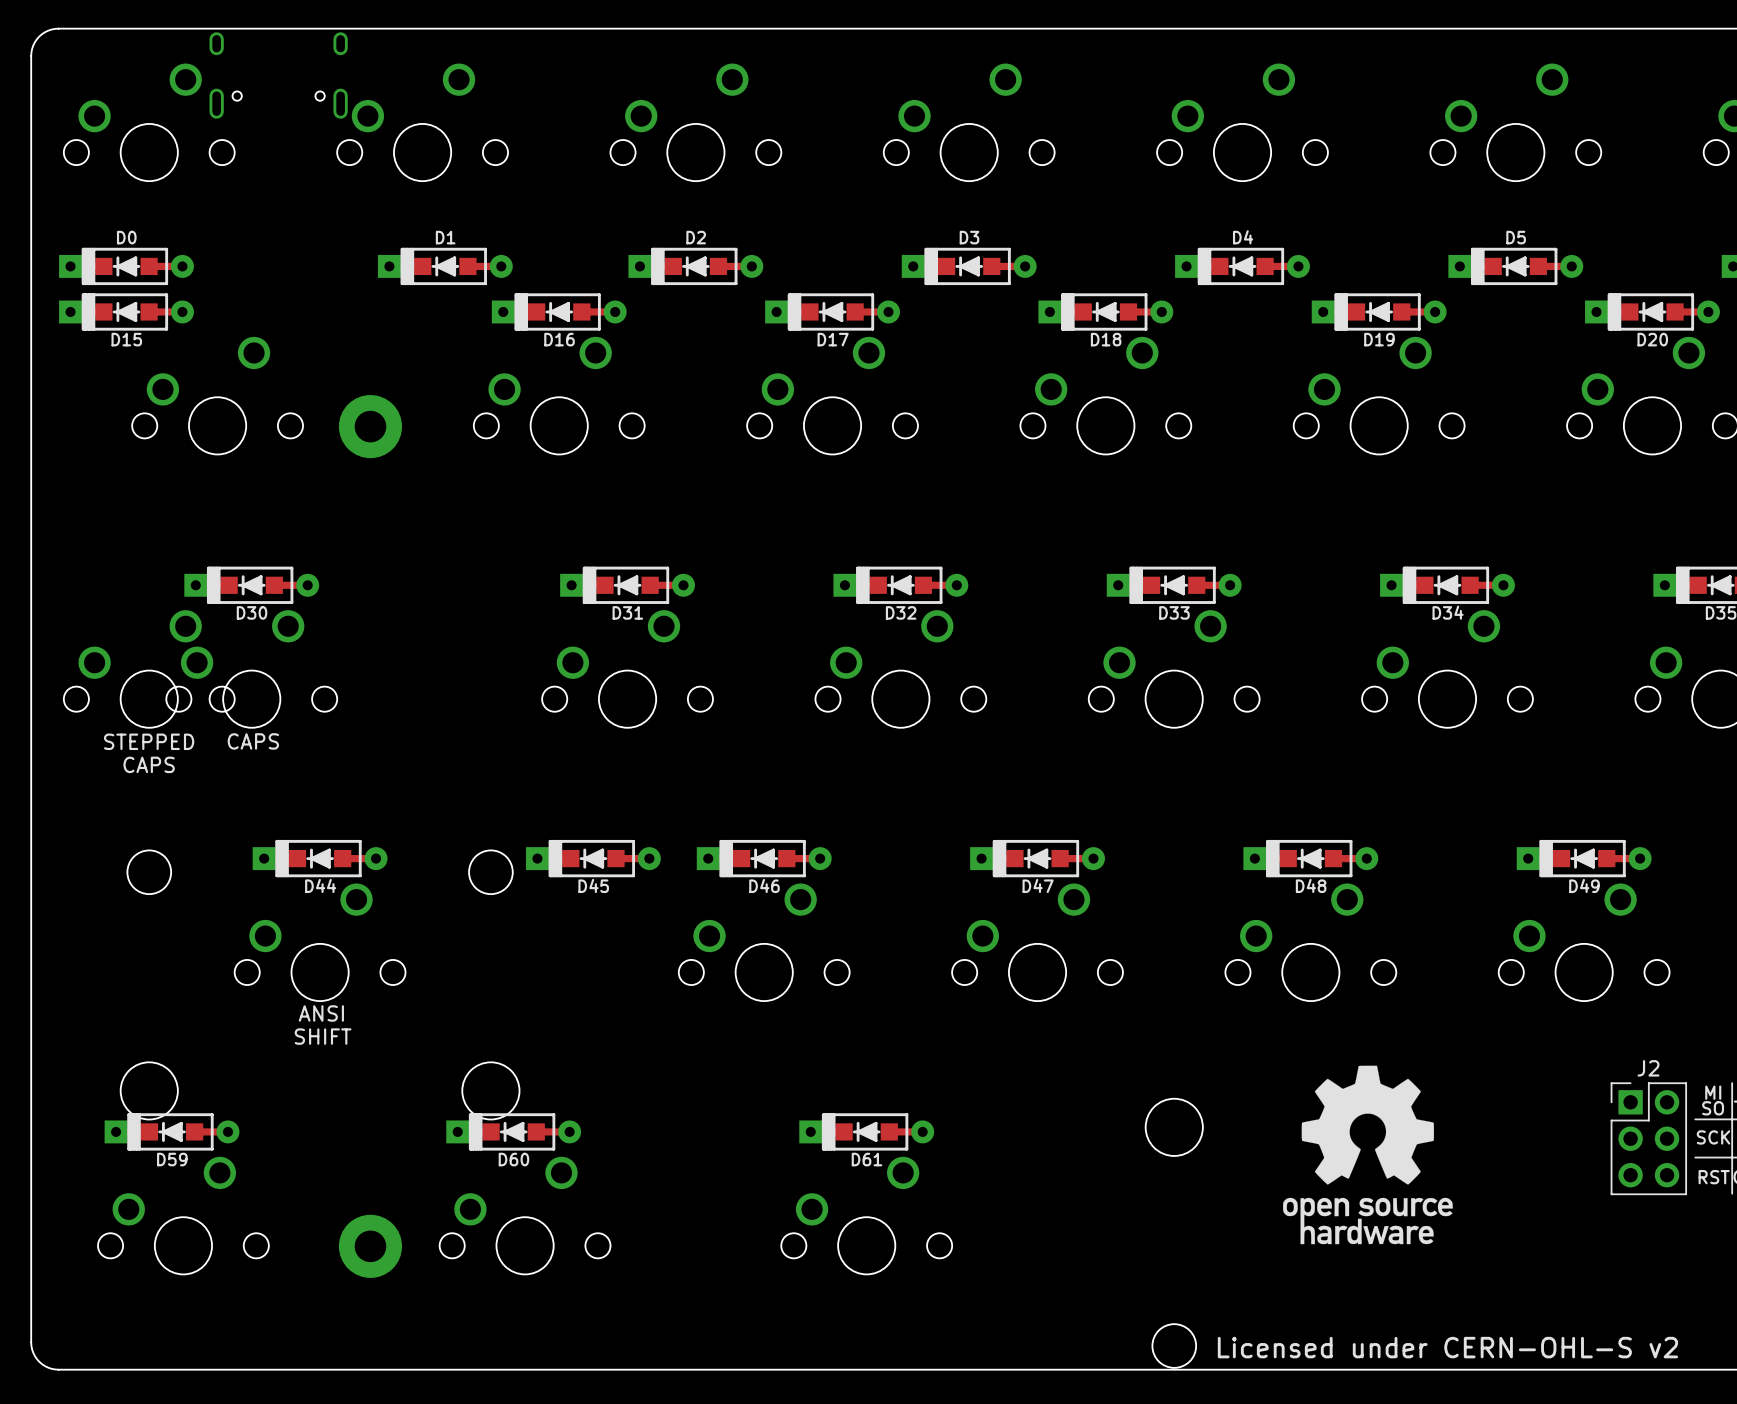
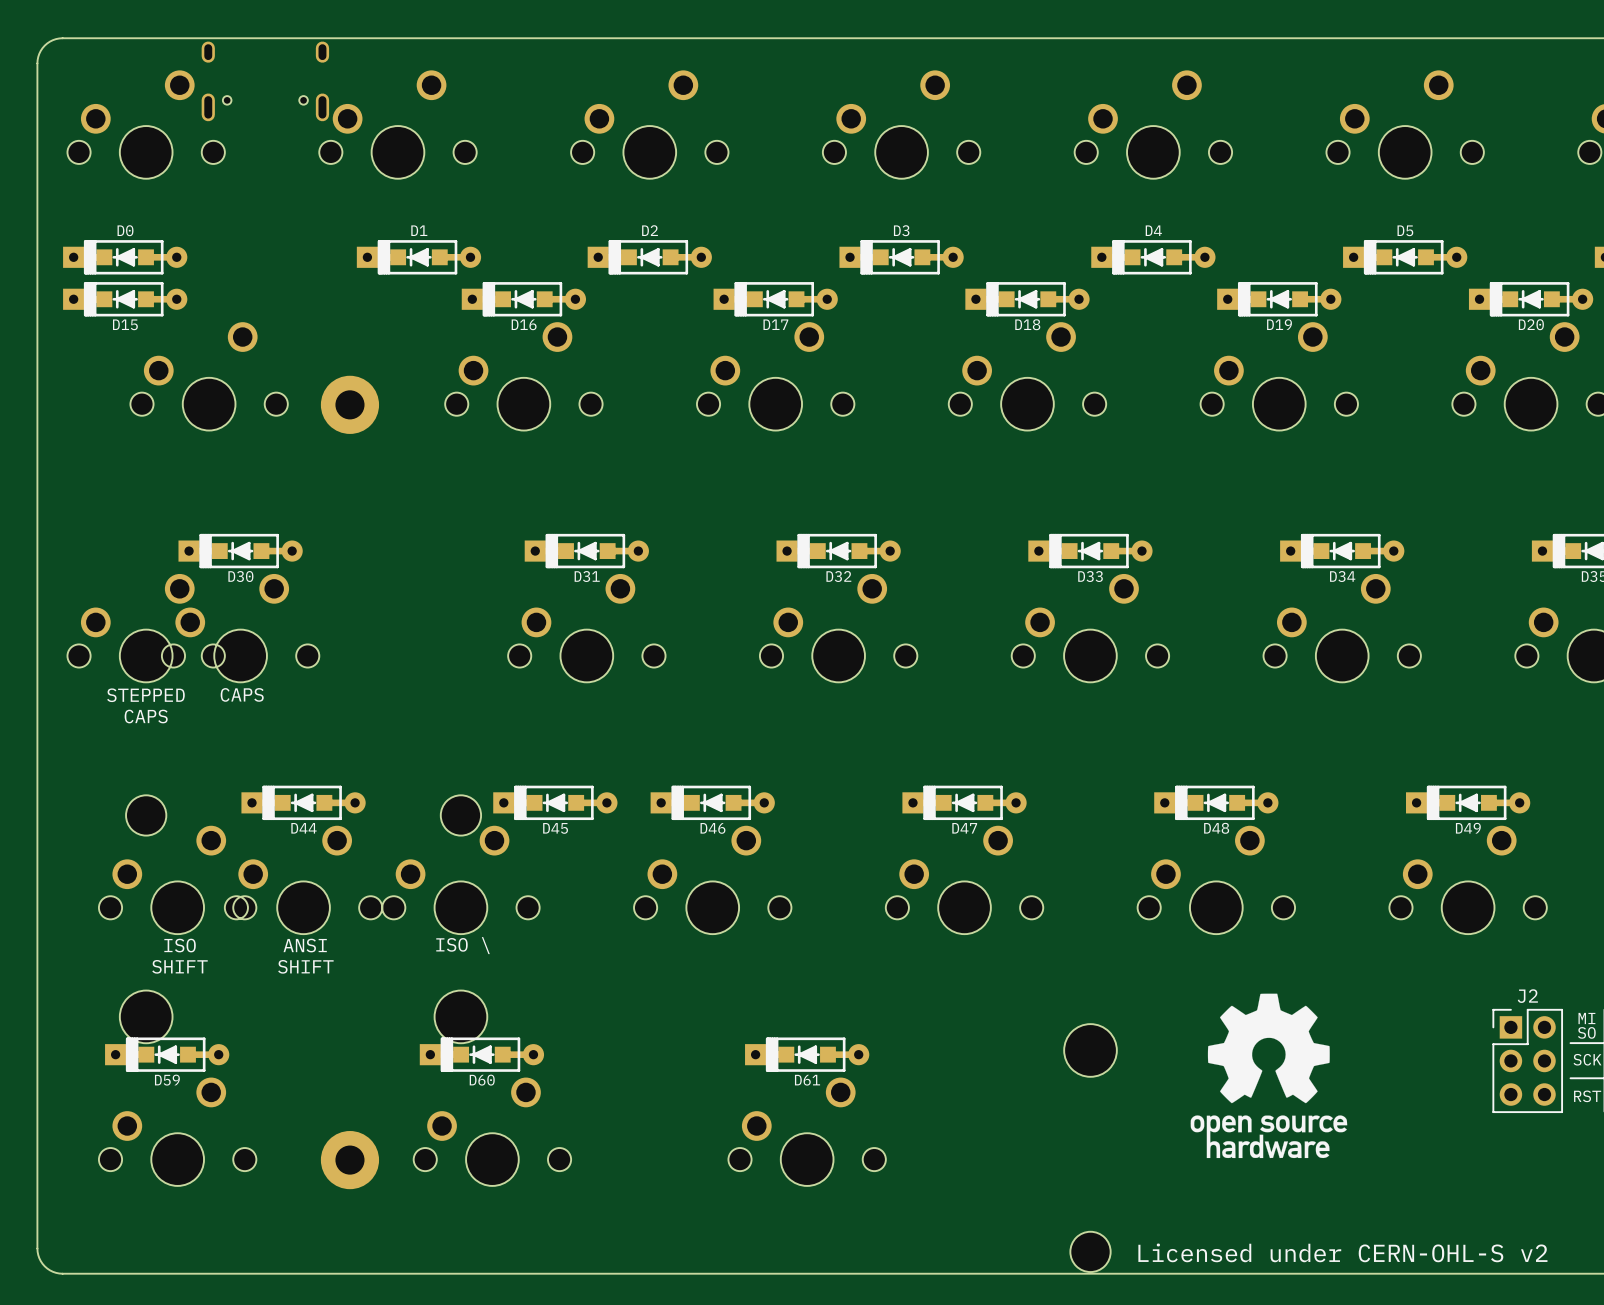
part: none -> (177, 879)
part: none -> (460, 879)
text: none -> ISO (180, 945)
text: none -> ISO \ (463, 945)
text: none -> SHIFT (179, 966)

